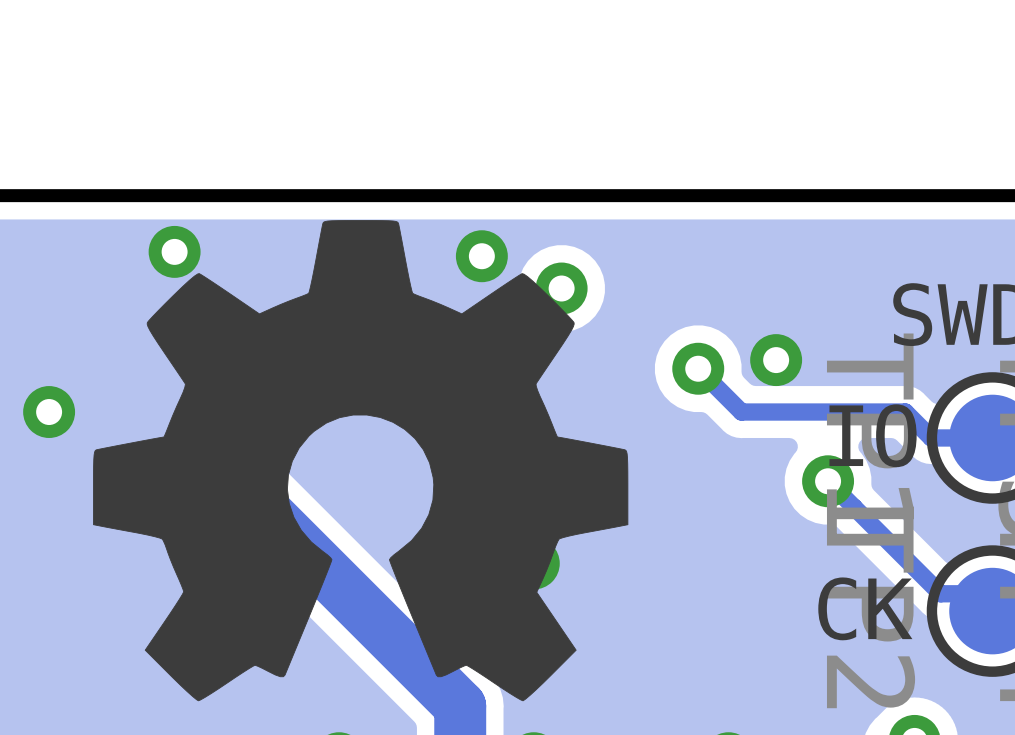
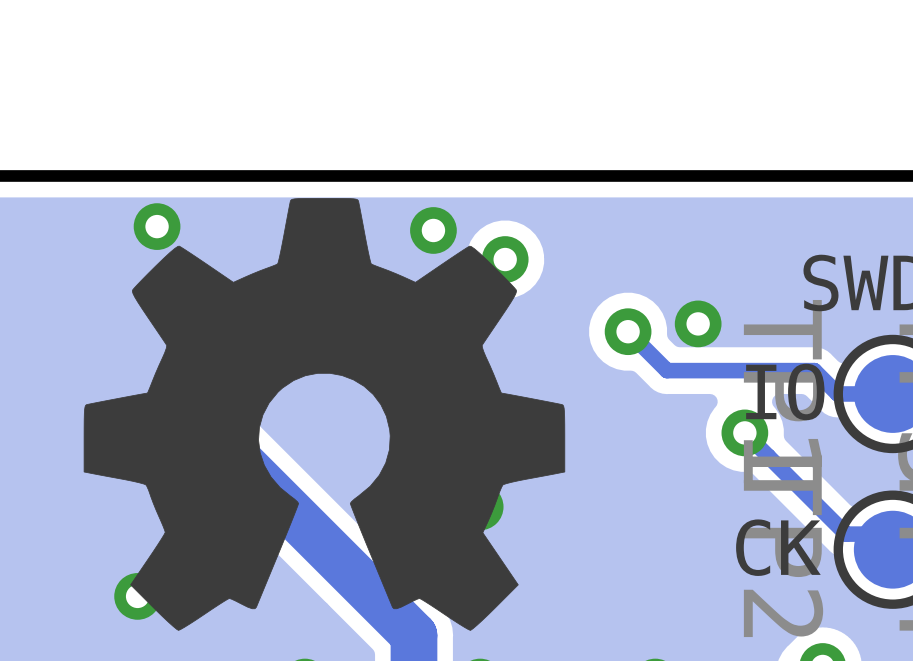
via: (49, 412) -> none
via: none -> (137, 596)

